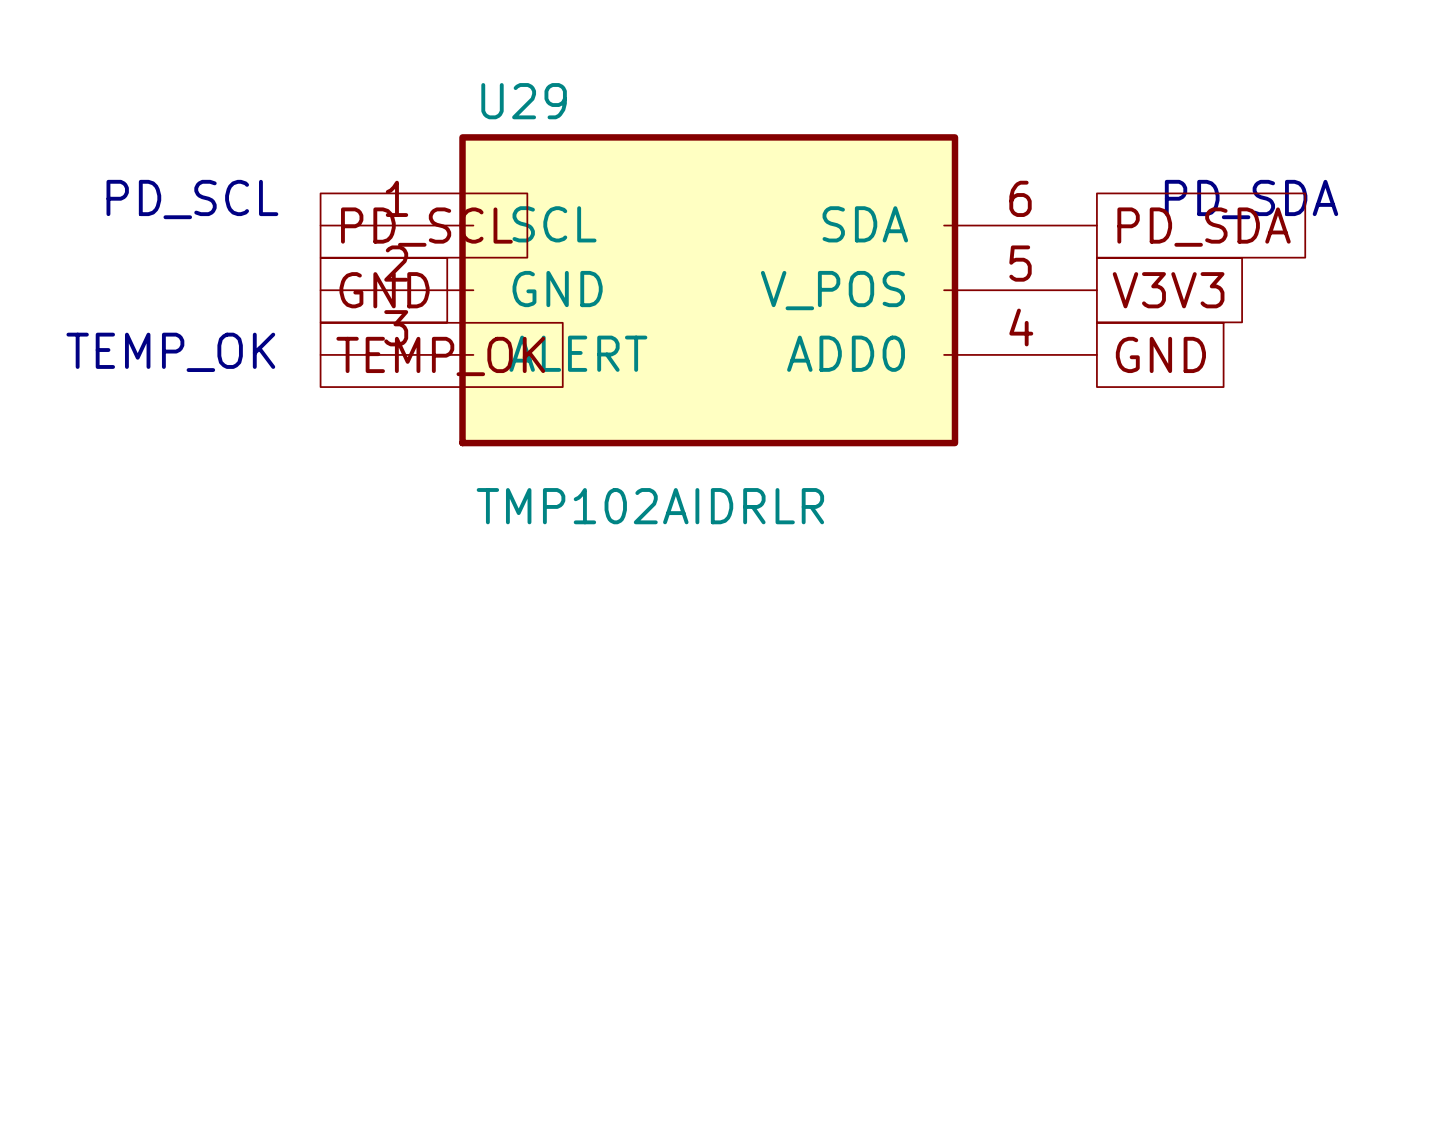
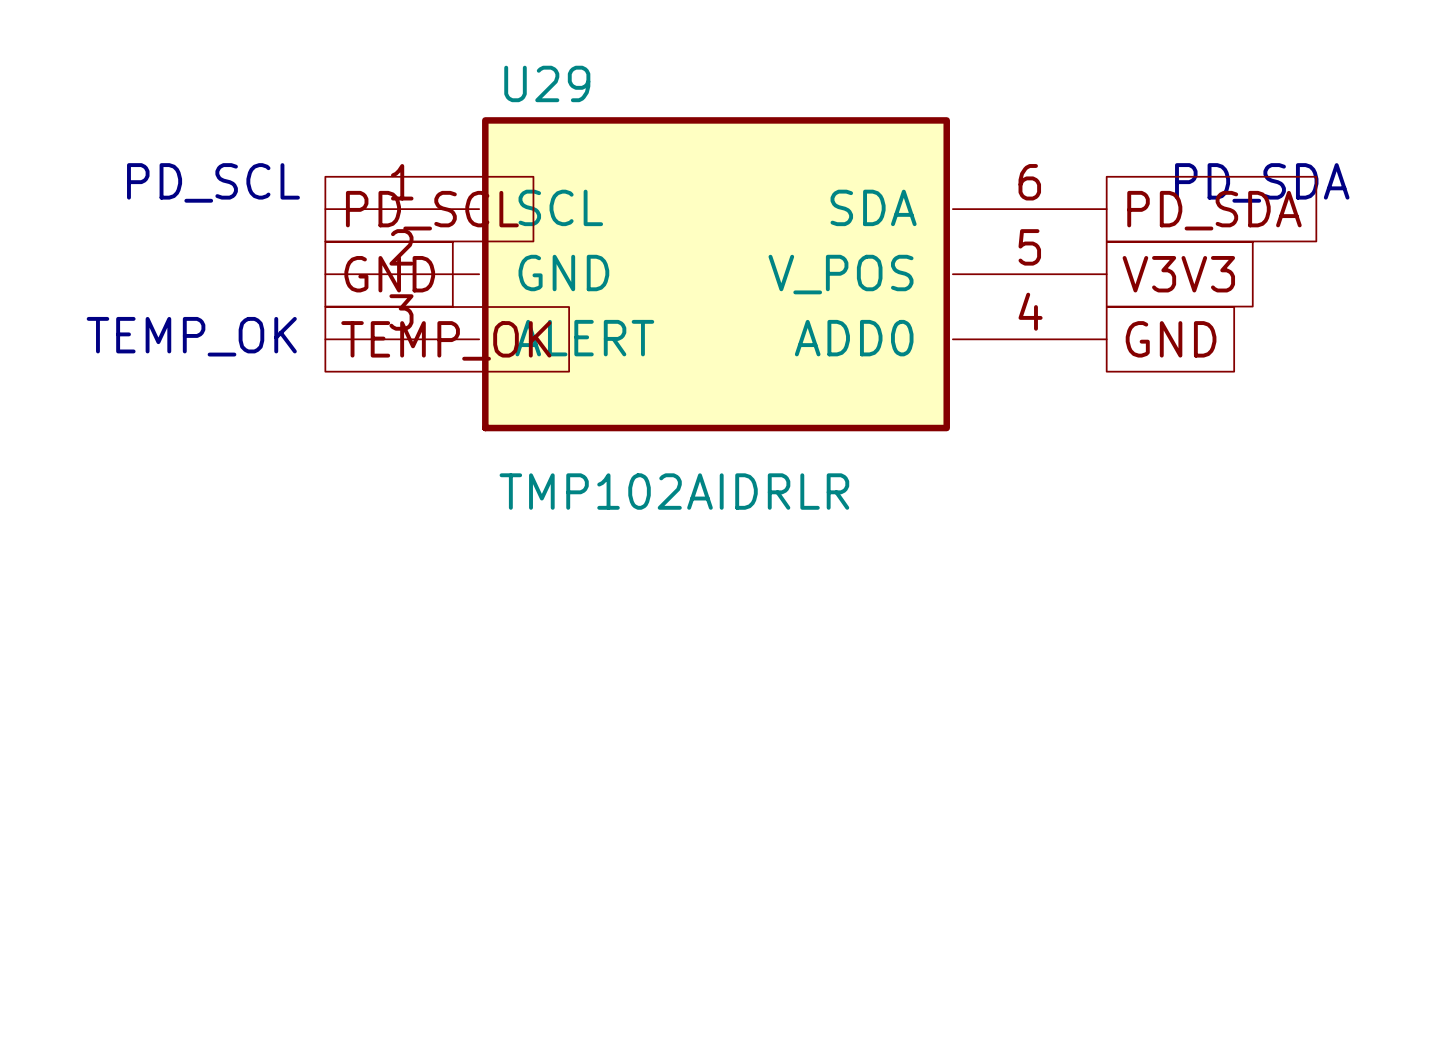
U29 name position: U29 (524, 101) -> U29 (547, 83)
U29 symbol: [320, 134, 1097, 447] -> [325, 117, 1107, 432]
text position: PD_SCL (192, 199) -> PD_SCL (213, 182)
text position: TEMP_OK (170, 352) -> TEMP_OK (191, 336)
U29 value position: TMP102AIDRLR (650, 506) -> TMP102AIDRLR (674, 491)

